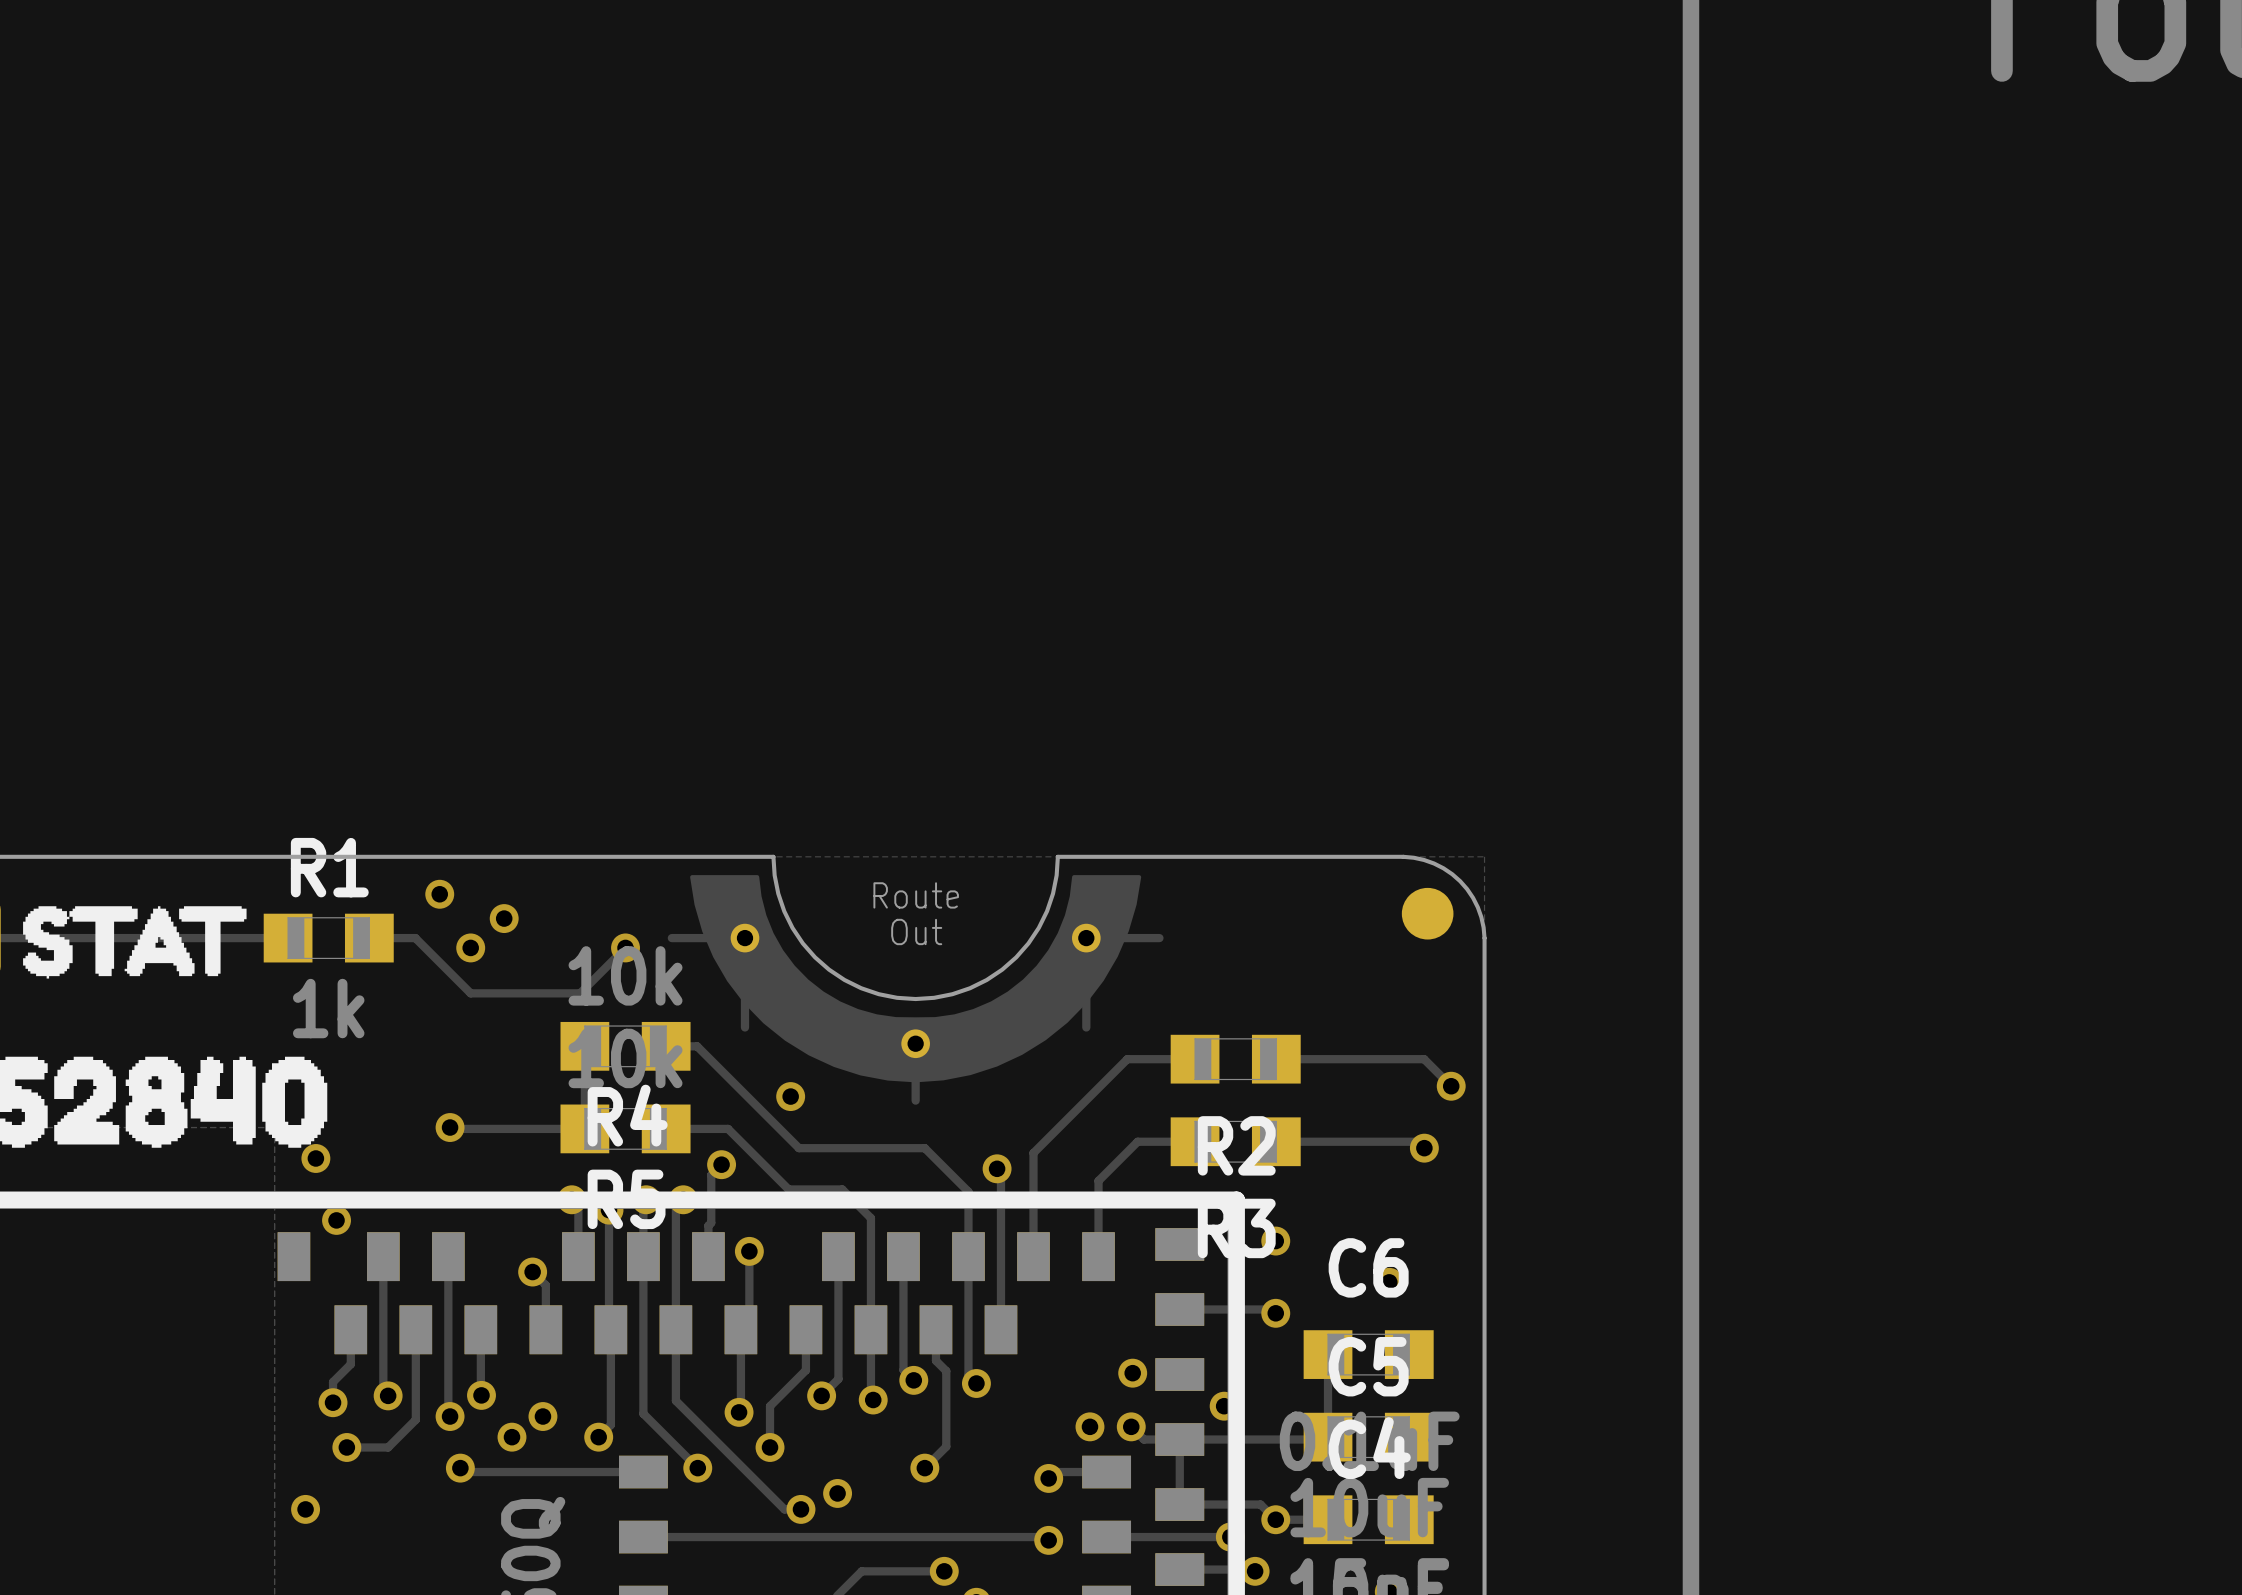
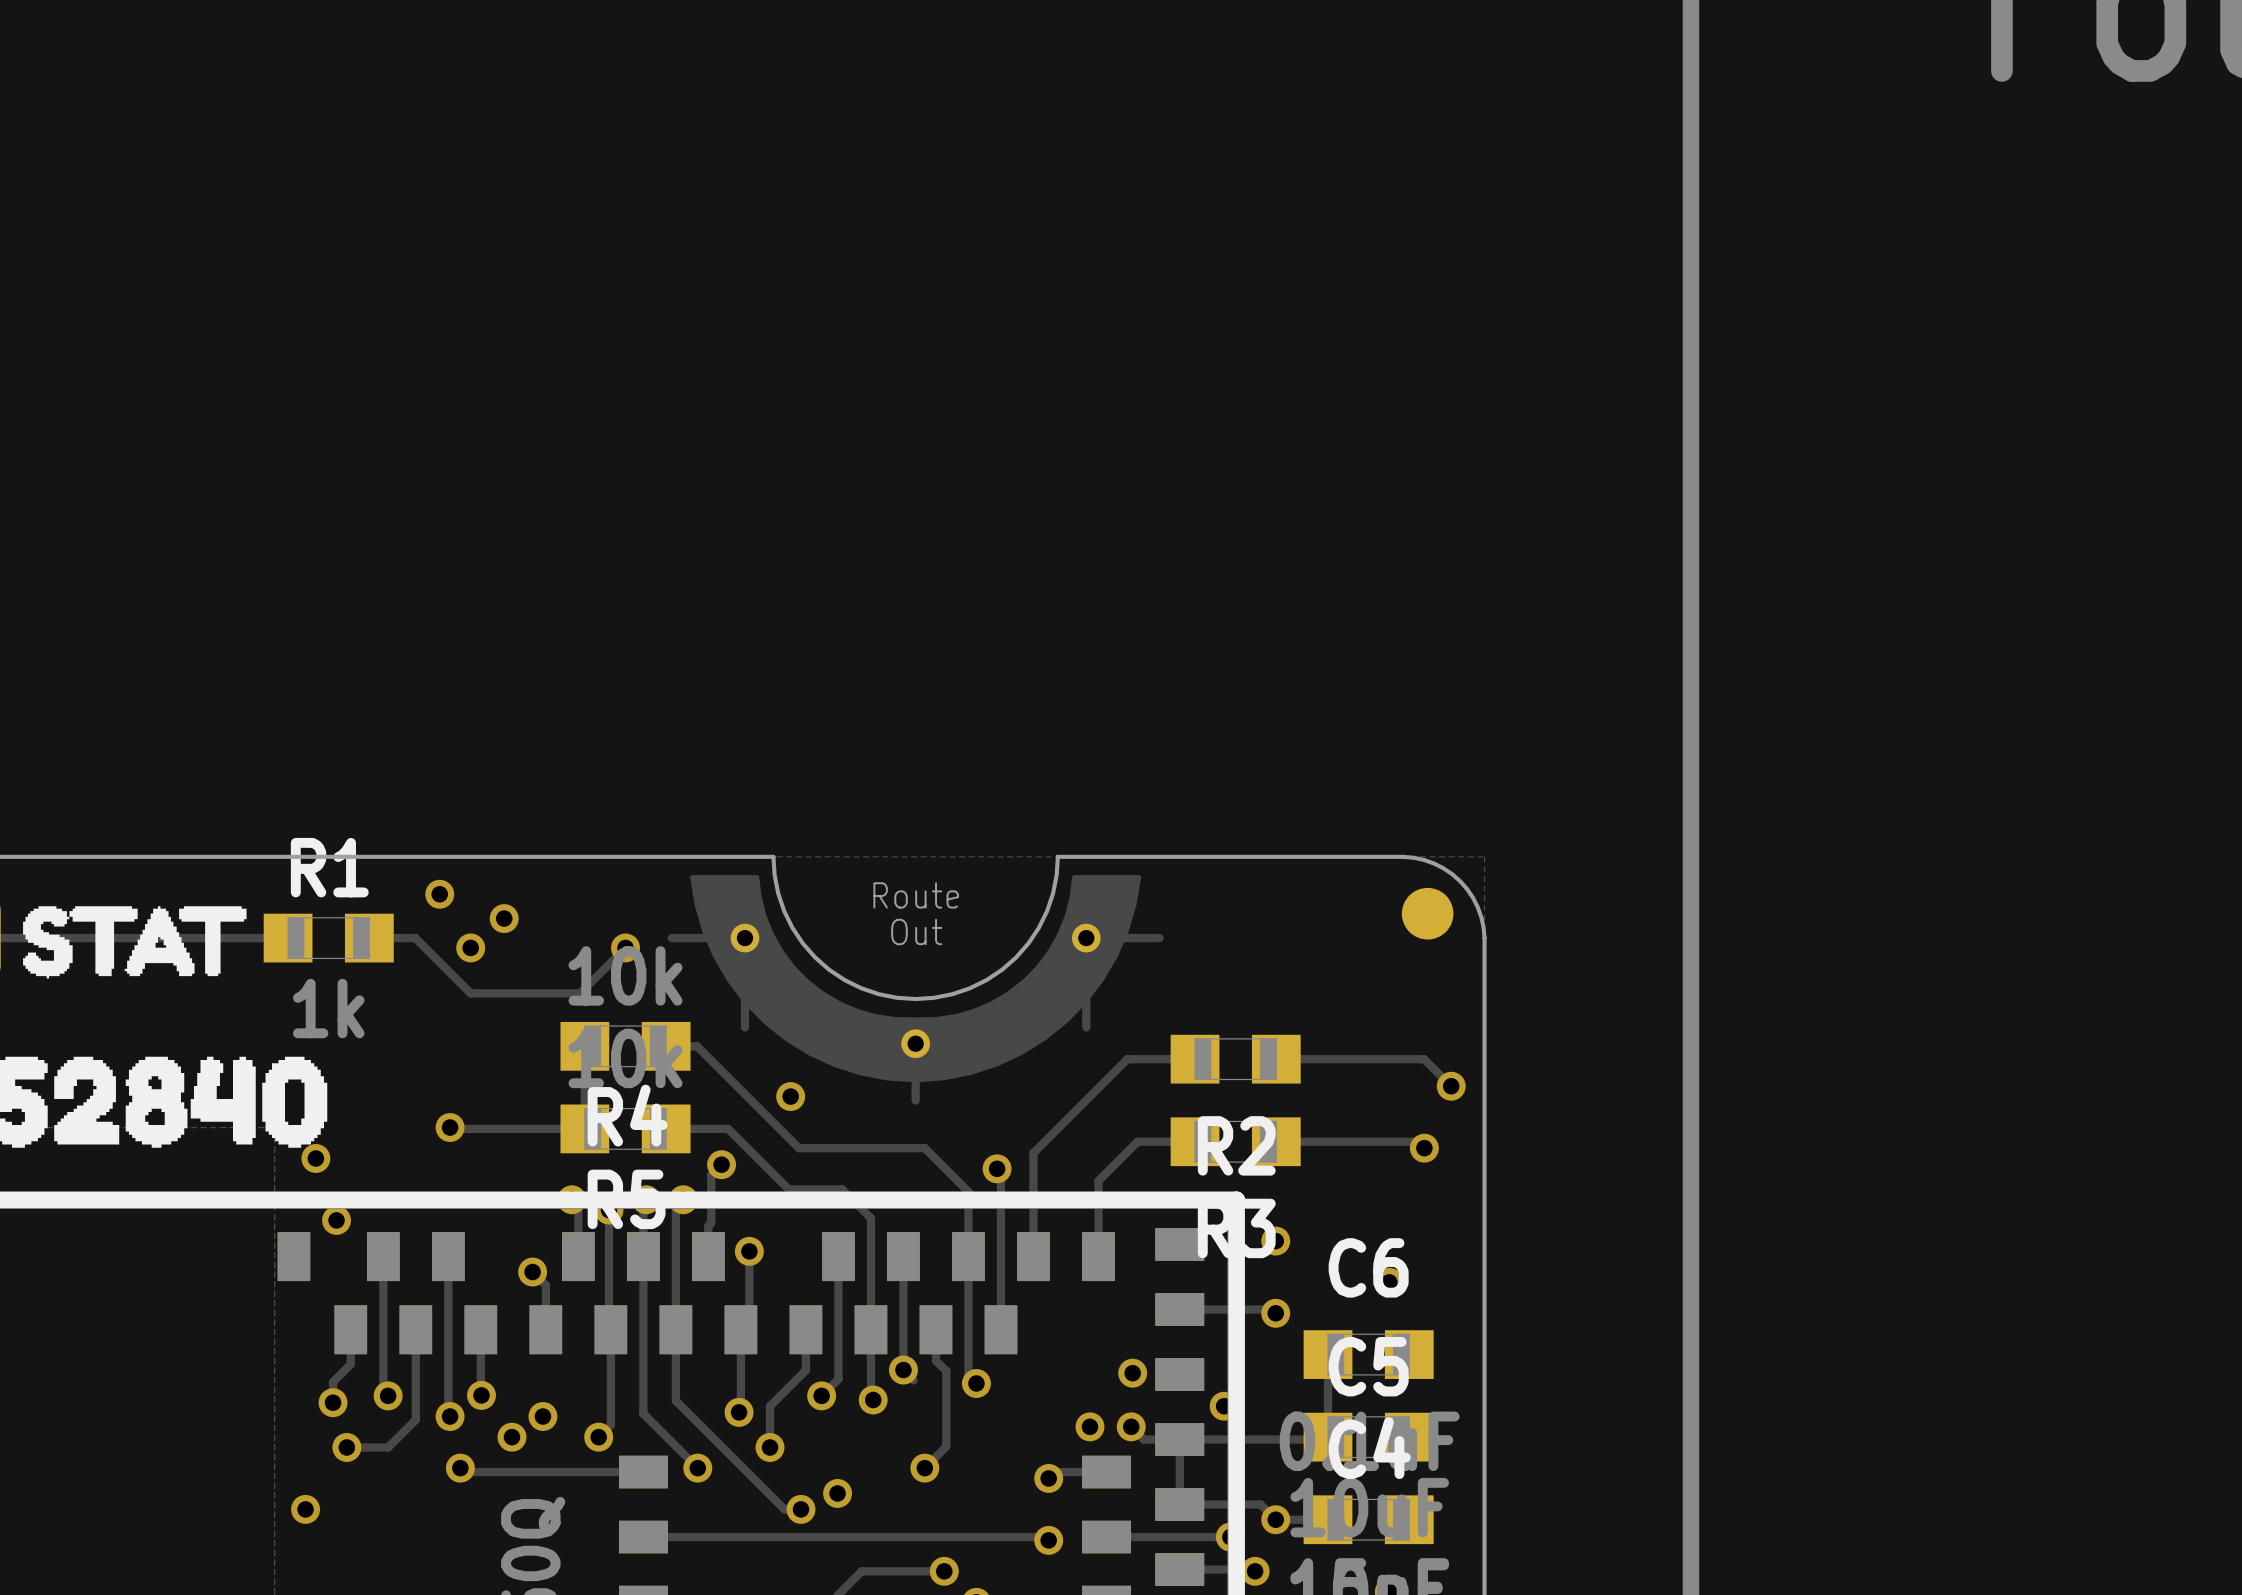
via position: (913, 1380) -> (903, 1370)

